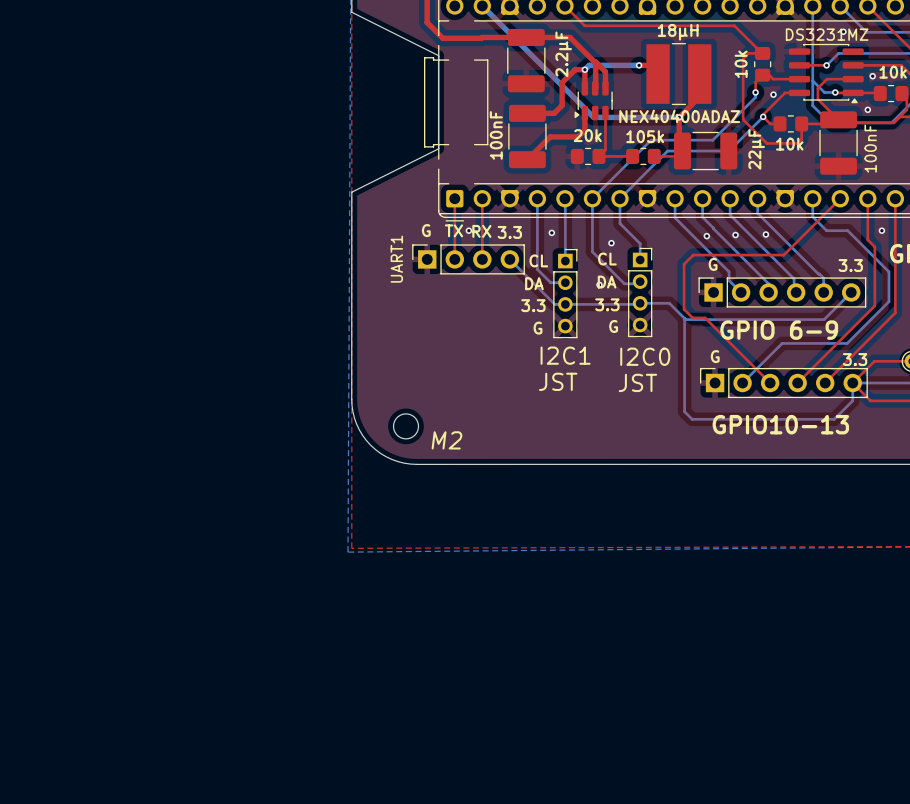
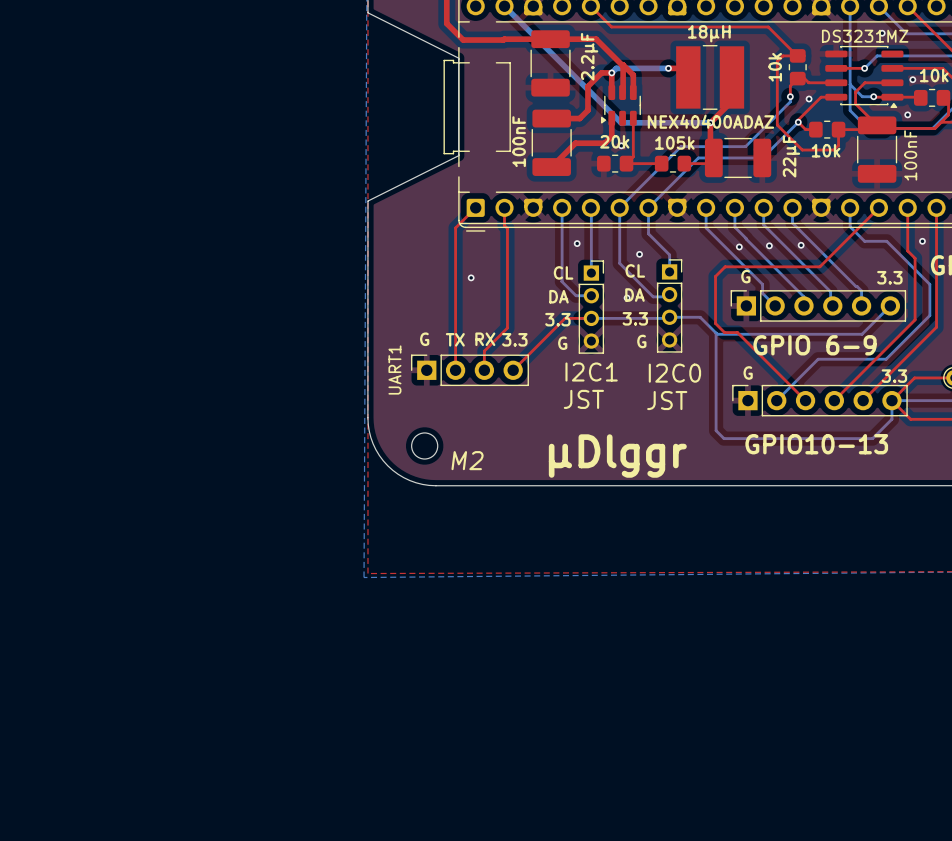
via: none -> (621, 145)
top track: (454, 198) (454, 259) -> (475, 207) (455, 227) (455, 370)
top track: (482, 215) (482, 259) -> (504, 225) (507, 228) (507, 328) (484, 351) (484, 370)
text position: G (426, 230) -> G (424, 339)
text position: TX (453, 230) -> TX (455, 339)
via position: (468, 230) -> (471, 277)
text position: RX (481, 231) -> RX (485, 339)
text position: 3.3 (509, 232) -> 3.3 (514, 339)
UART1 position: (468, 259) -> (469, 370)
bottom track: (509, 259) (554, 304) -> none
top track: none -> (591, 318) (565, 318) (513, 370)
text: none -> µDlggr (617, 456)

